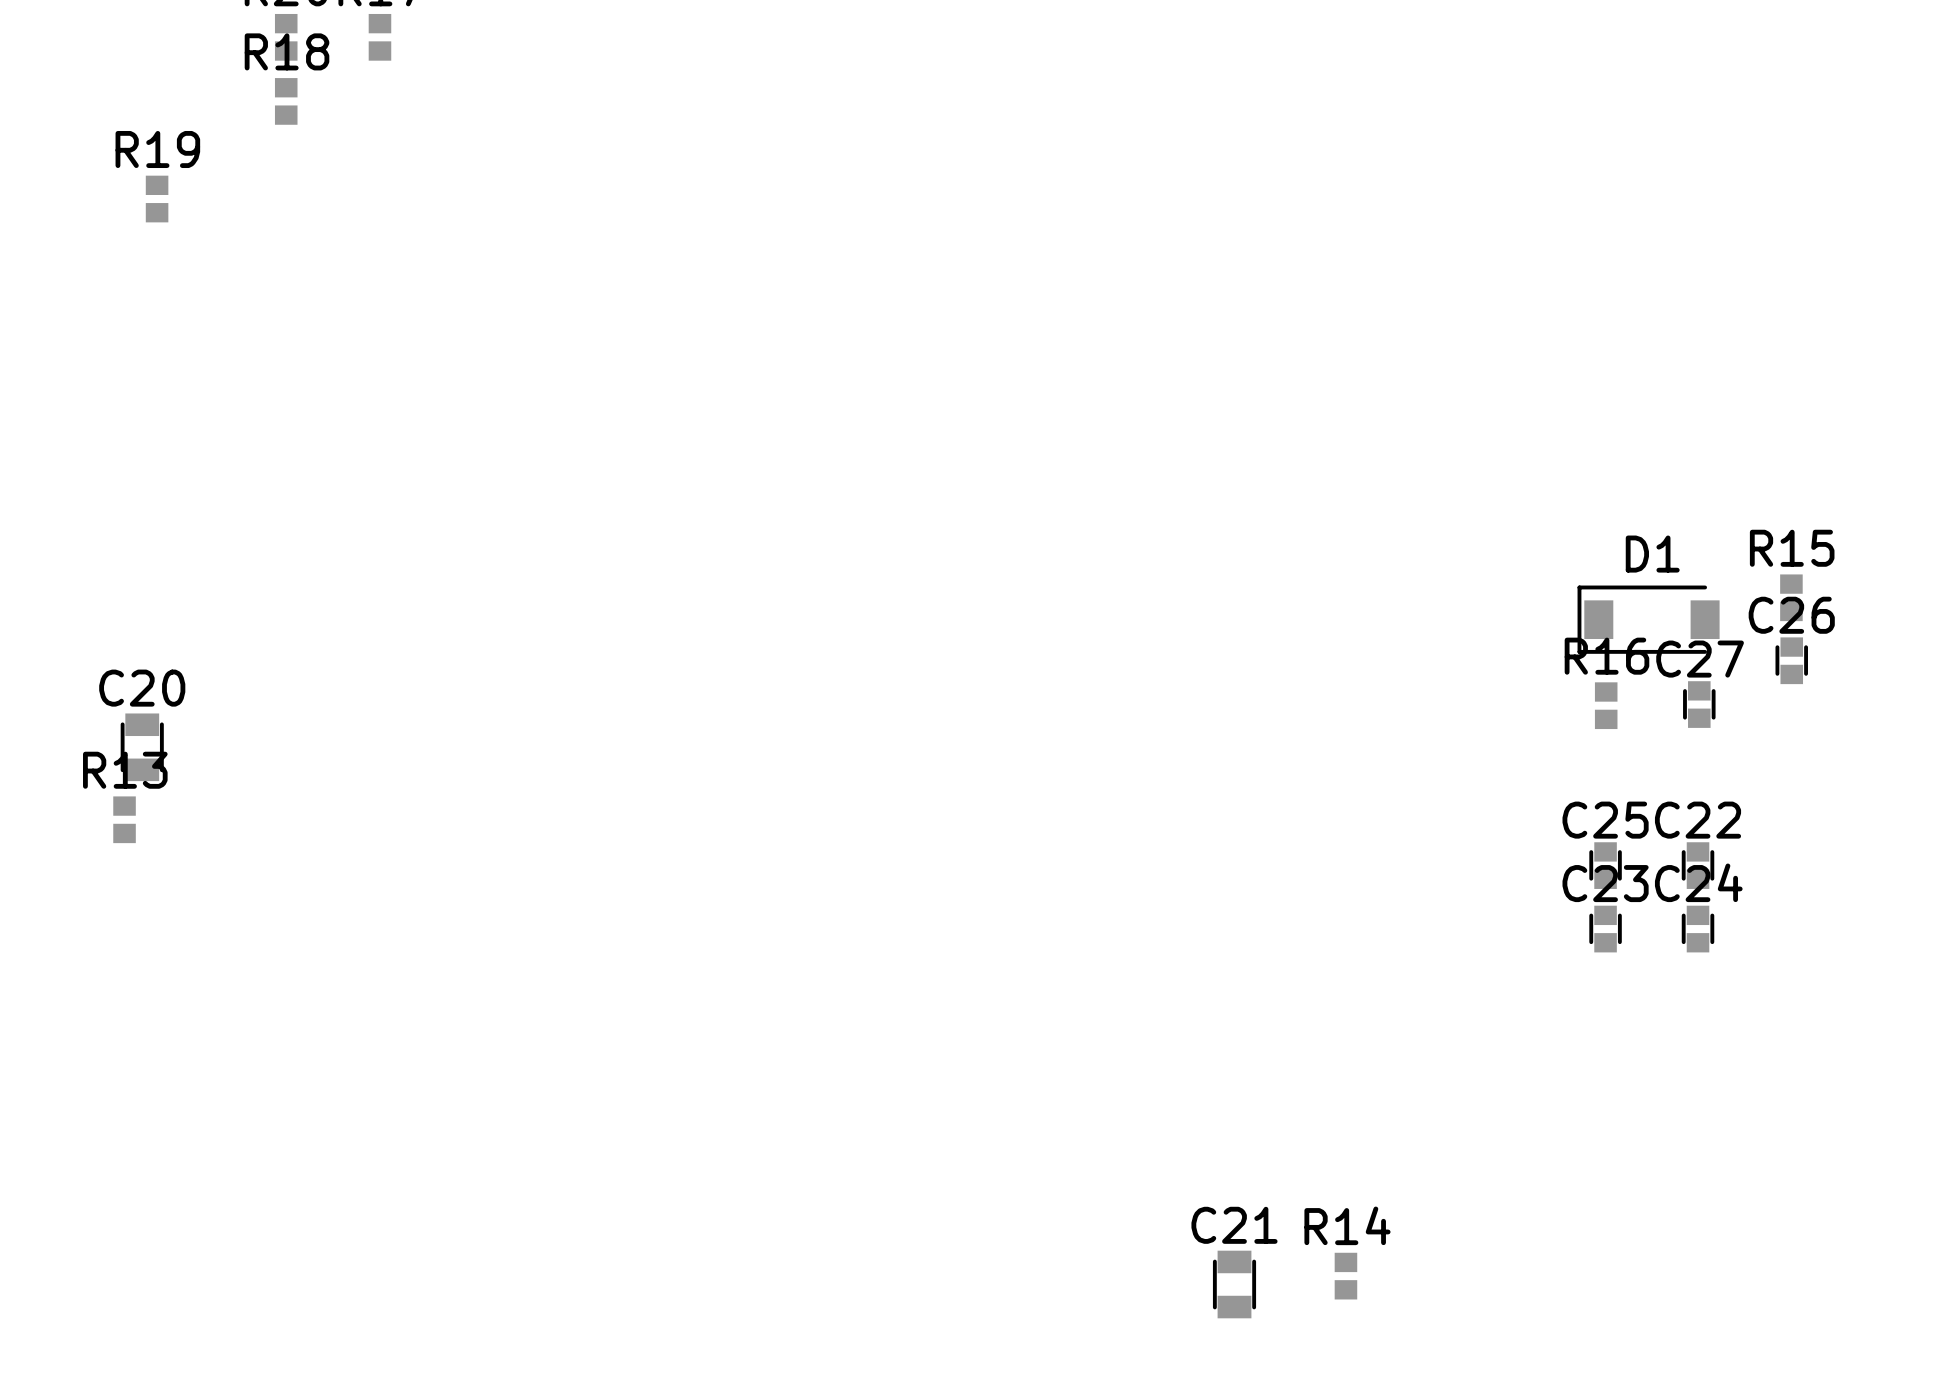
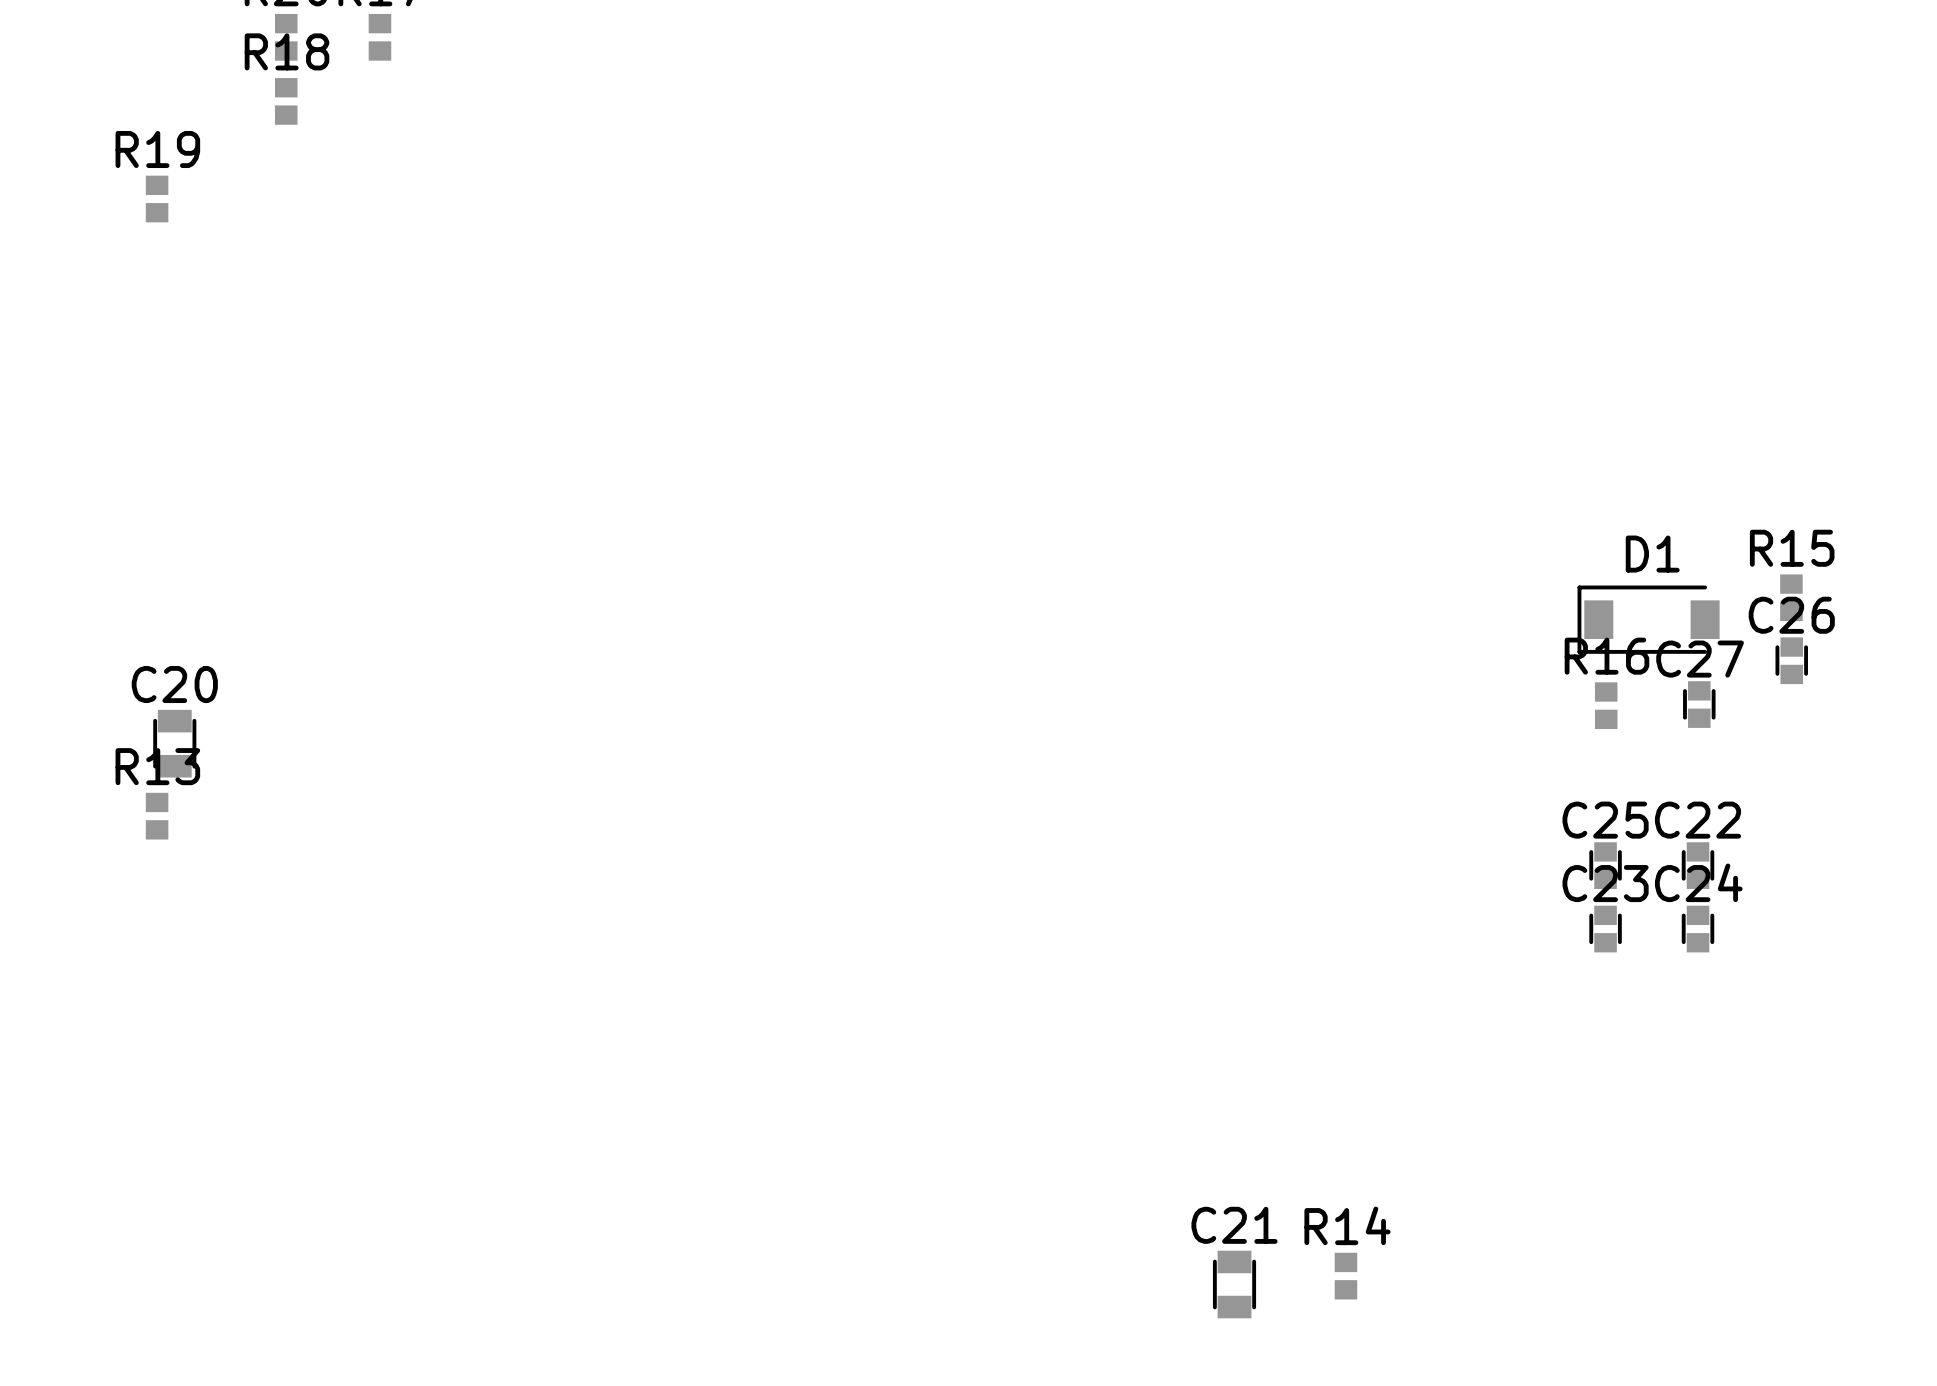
C20 position: (142, 747) -> (174, 743)
R13 position: (124, 819) -> (157, 816)

